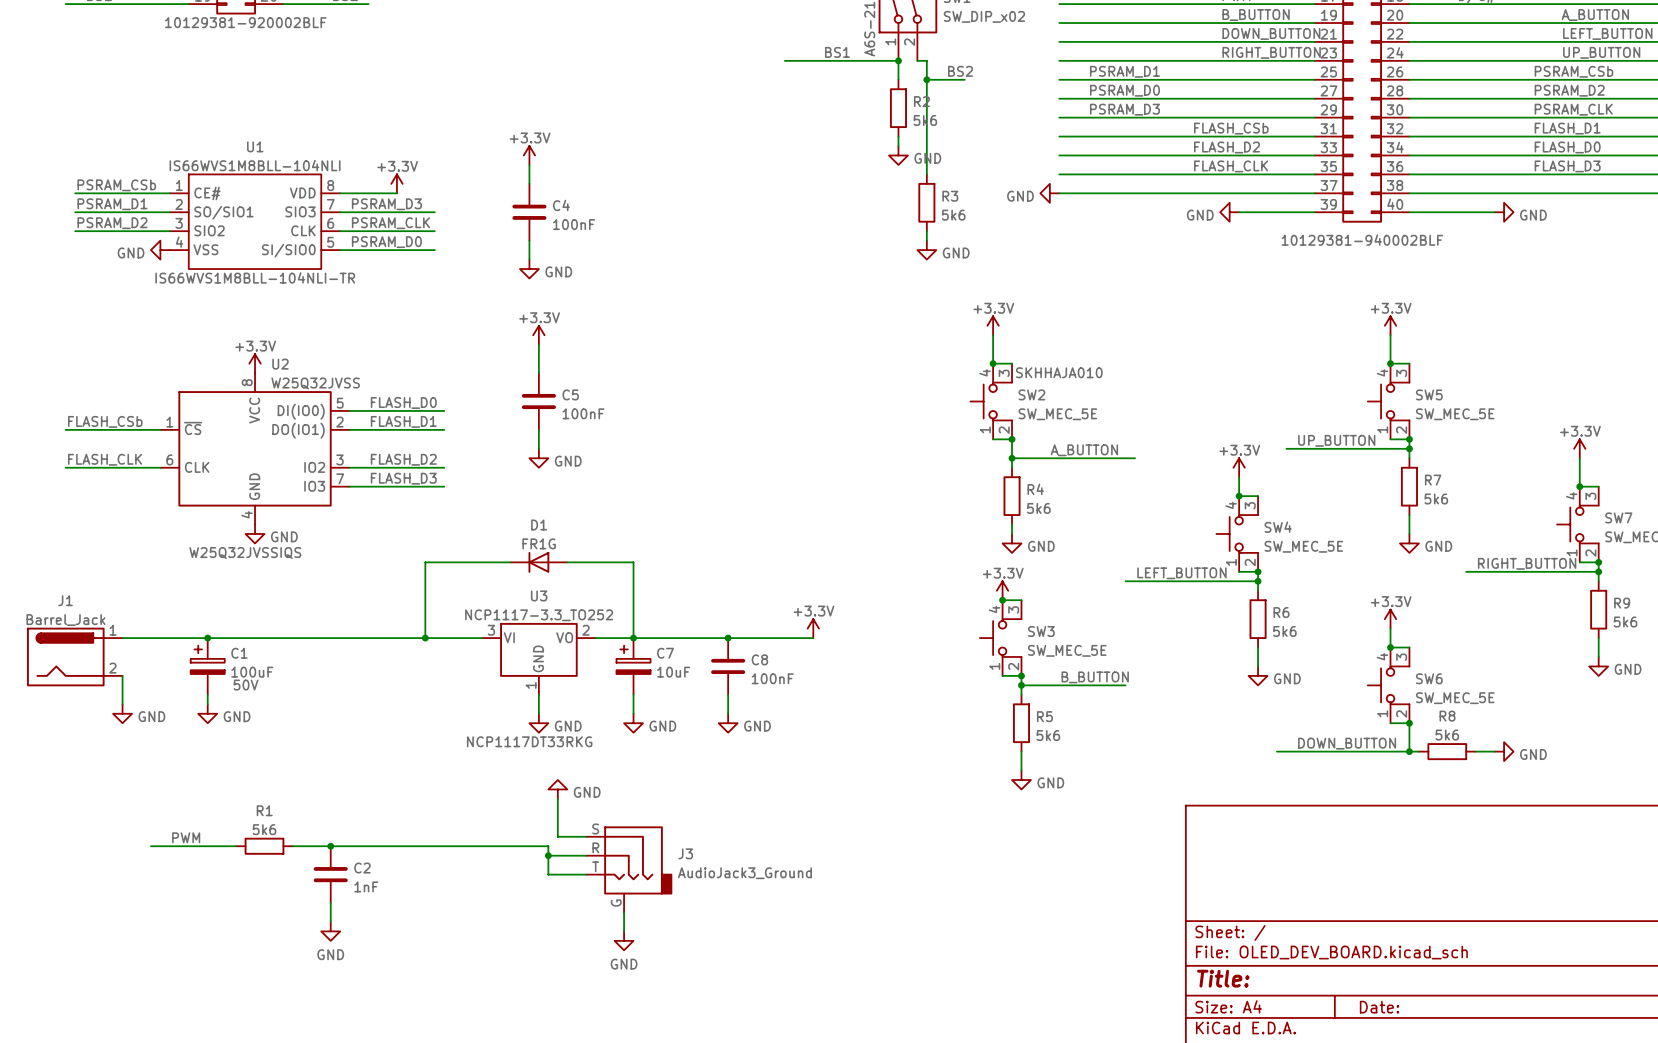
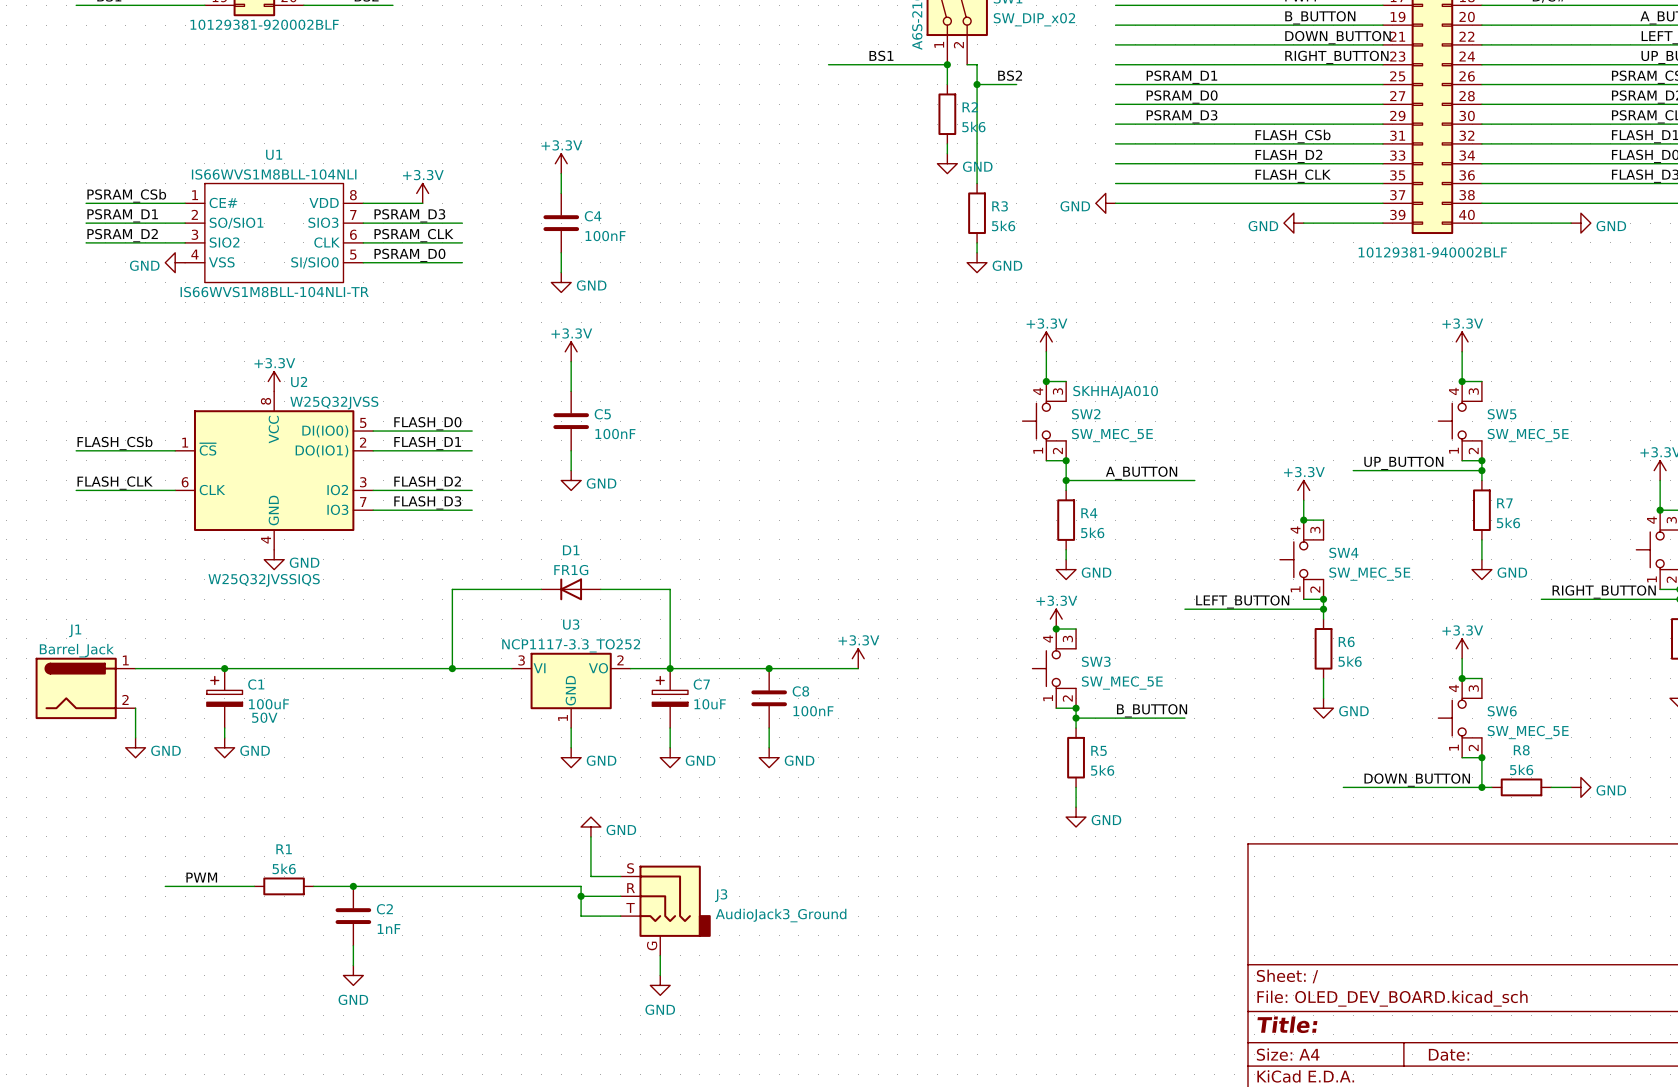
U3 text: NCP1117DT33RKG (529, 741) -> none

